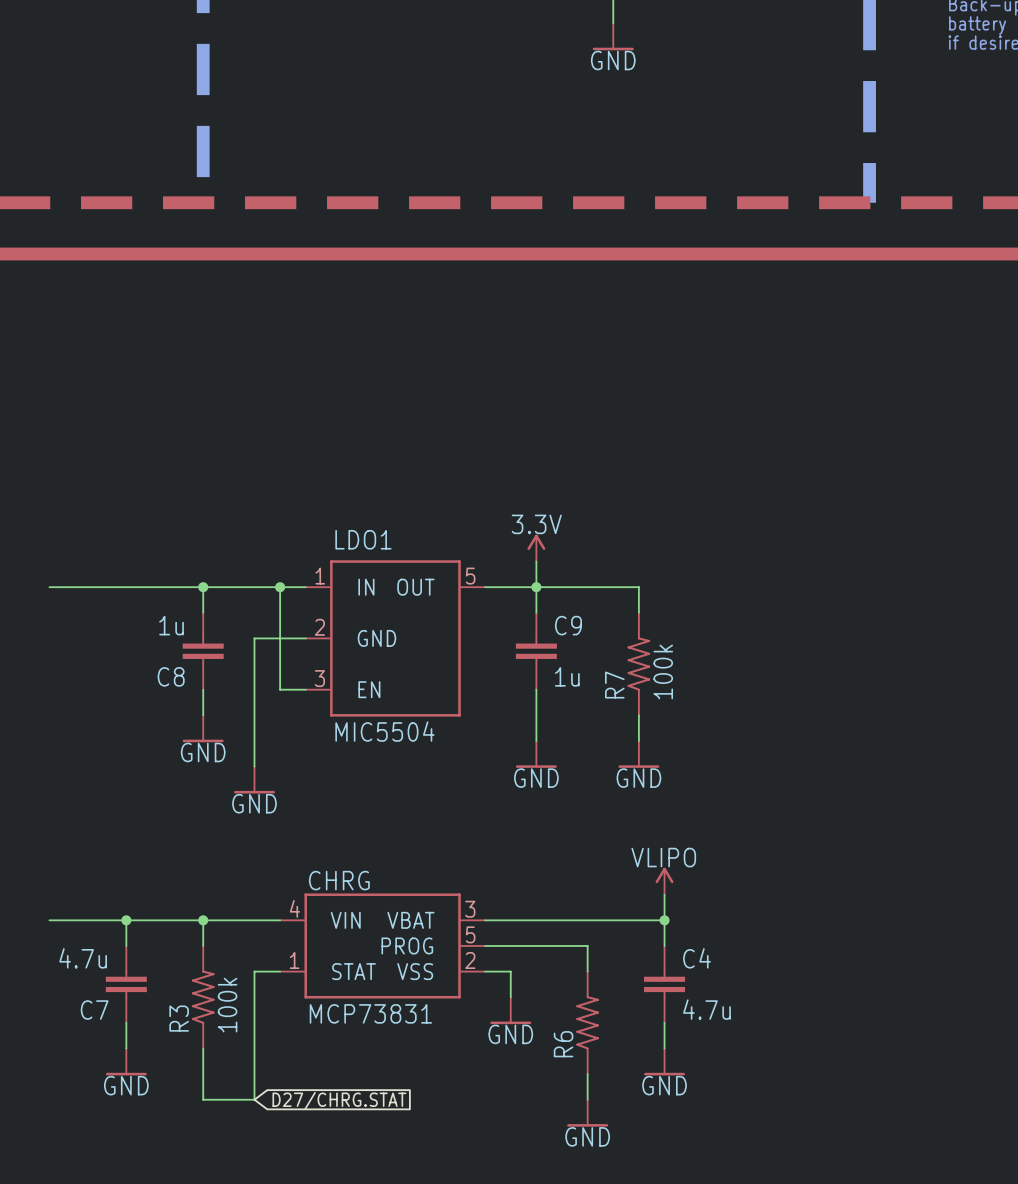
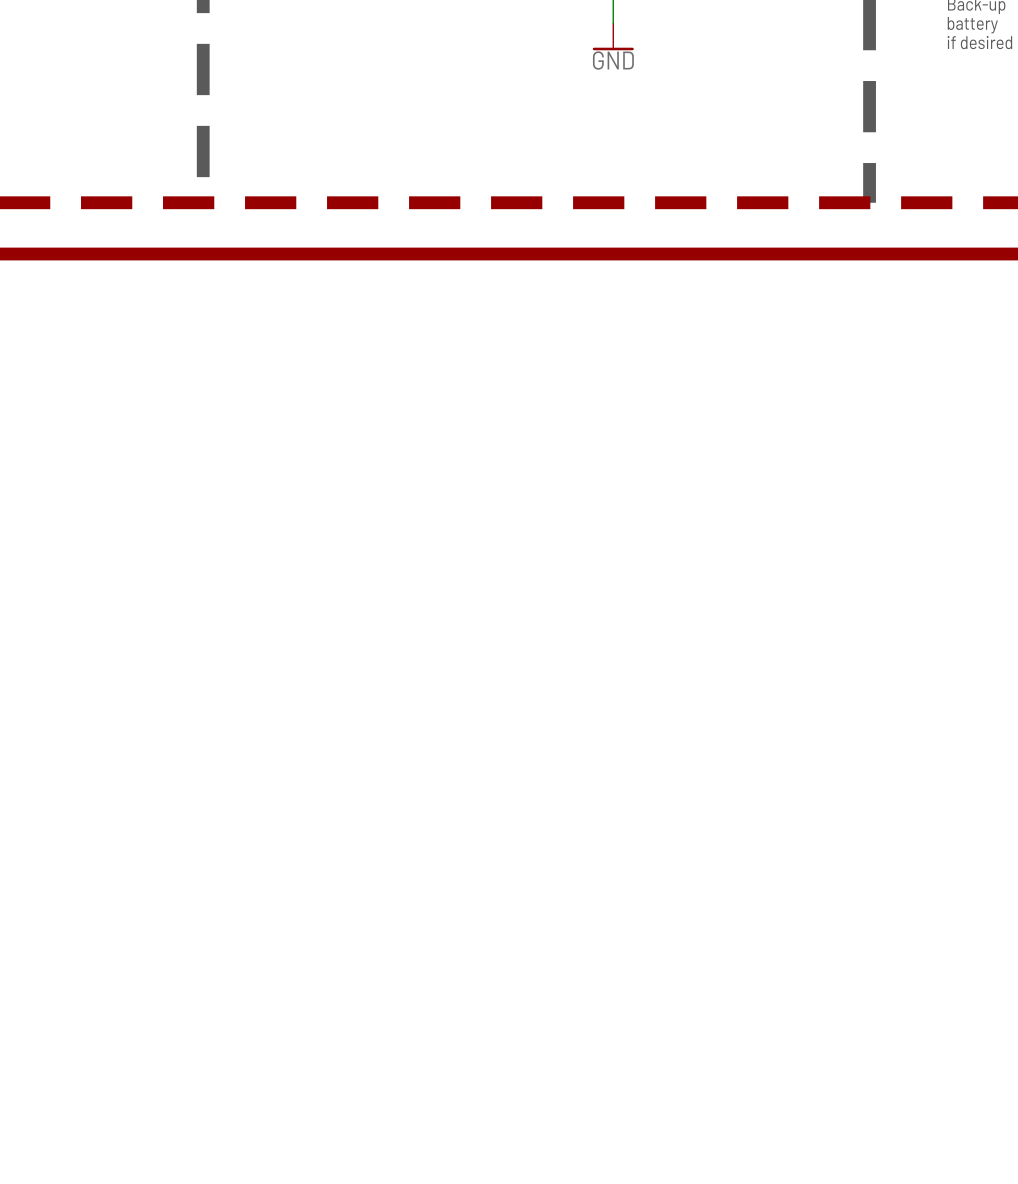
power symbol: 3.3V (536, 548) -> none
wire: (536, 561) (536, 612) -> none
wire: (49, 587) (305, 587) -> none
wire: (203, 587) (203, 612) -> none
junction: (203, 587) -> none
wire: (280, 587) (280, 689) (305, 689) -> none
junction: (280, 587) -> none
wire: (485, 587) (638, 587) (638, 612) -> none
junction: (536, 587) -> none
wire: (305, 638) (254, 638) (254, 766) -> none
LDO1: MIC5504 (395, 638) -> none
C8: 1u (203, 651) -> none
C9: 1u (536, 651) -> none
R7: 100k (638, 664) -> none
wire: (203, 689) (203, 715) -> none
wire: (536, 689) (536, 740) -> none
wire: (638, 715) (638, 740) -> none
power symbol: GND (203, 728) -> none
power symbol: GND (536, 754) -> none
power symbol: GND (638, 754) -> none
power symbol: GND (254, 780) -> none
power symbol: VLIPO (664, 881) -> none
wire: (664, 894) (664, 945) -> none
wire: (49, 920) (280, 920) -> none
wire: (126, 920) (126, 945) -> none
junction: (126, 920) -> none
wire: (203, 920) (203, 945) -> none
junction: (203, 920) -> none
wire: (485, 920) (664, 920) -> none
junction: (664, 920) -> none
CHRG: MCP73831 (382, 945) -> none
wire: (485, 945) (587, 945) (587, 971) -> none
wire: (280, 971) (254, 971) (254, 1099) (203, 1099) (203, 1048) -> none
wire: (485, 971) (510, 971) (510, 997) -> none
C7: 4.7u (126, 984) -> none
C4: 4.7u (664, 984) -> none
R3: 100k (203, 997) -> none
power symbol: GND (510, 1010) -> none
wire: (126, 1022) (126, 1048) -> none
R6: (587, 1022) -> none
wire: (664, 1022) (664, 1048) -> none
power symbol: GND (126, 1061) -> none
power symbol: GND (664, 1061) -> none
wire: (587, 1074) (587, 1099) -> none
global label: D27/CHRG.STAT (339, 1100) -> none
power symbol: GND (587, 1113) -> none

